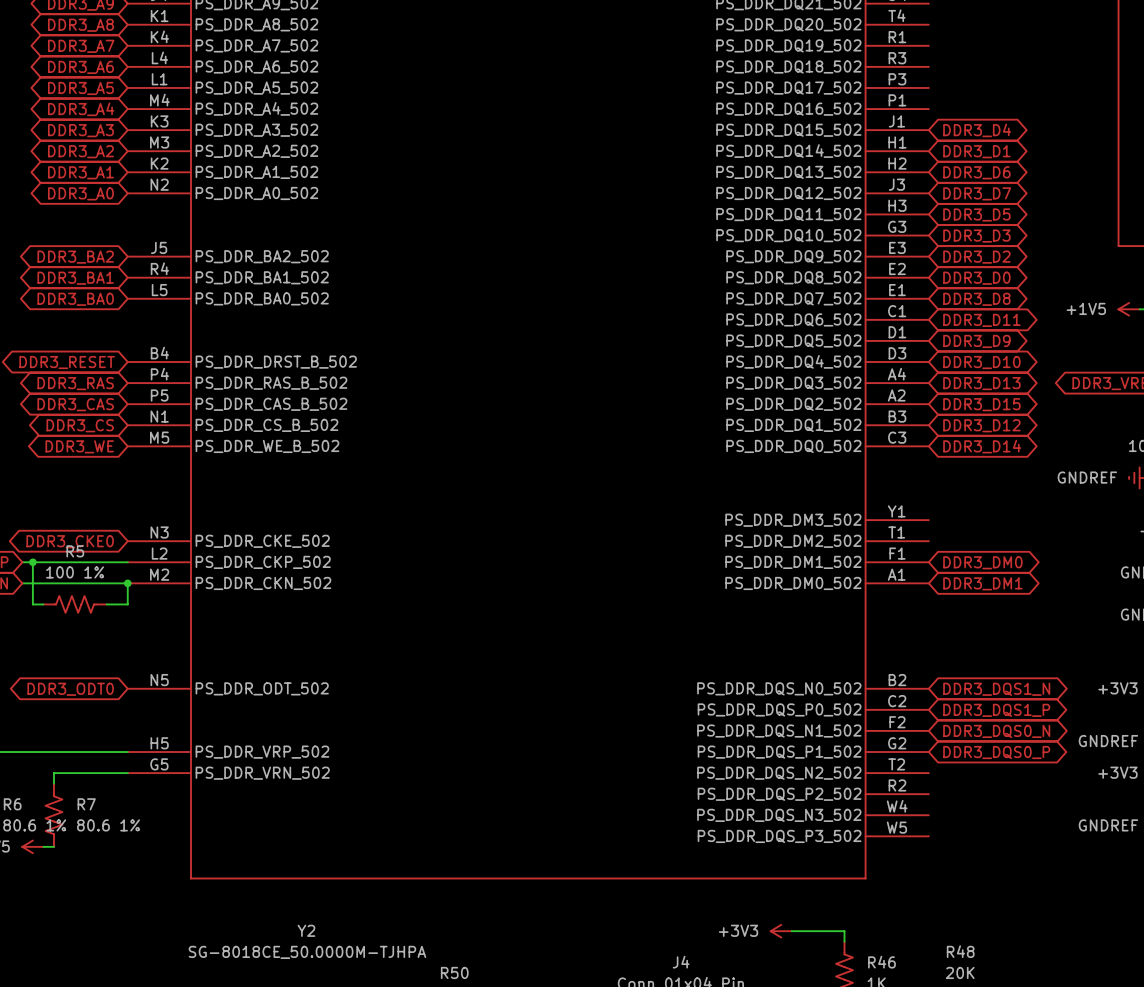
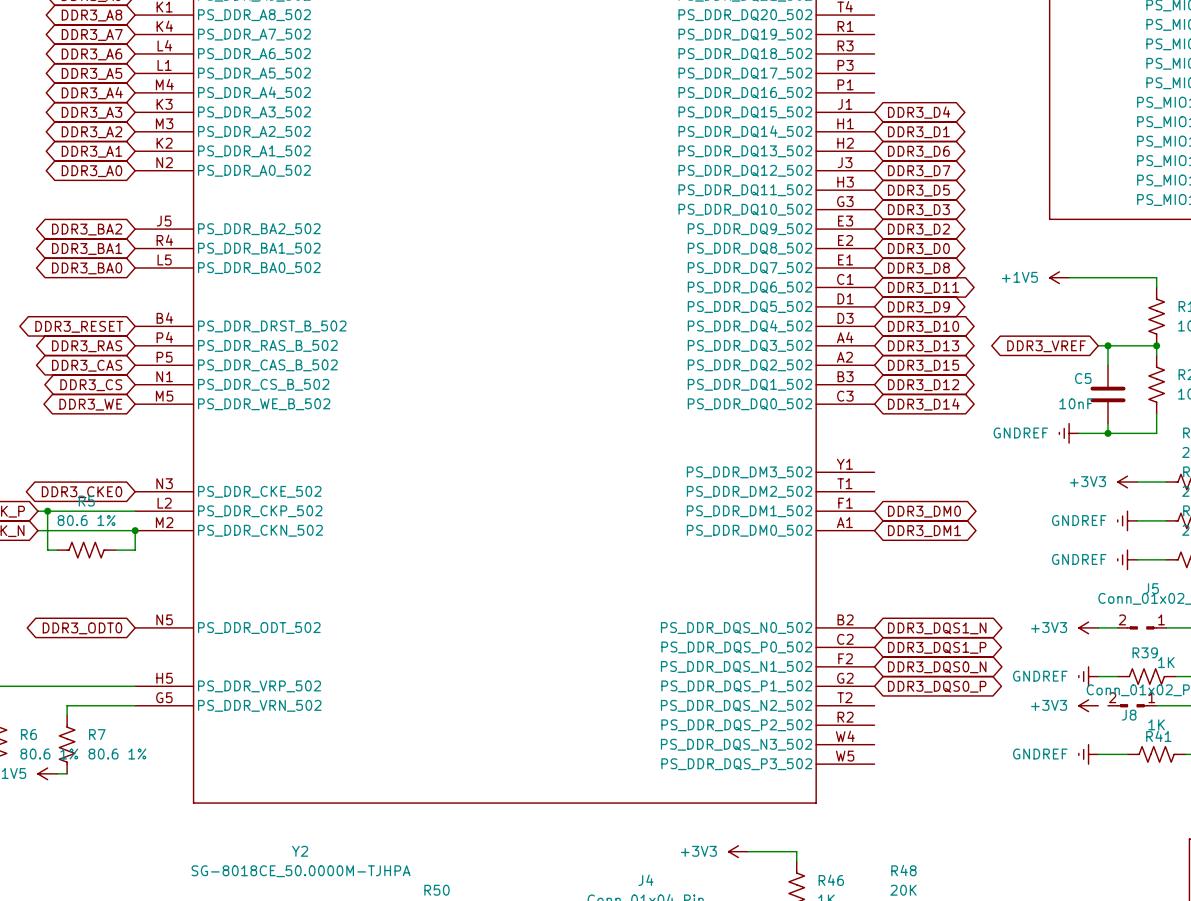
R5 value: 100 1% (75, 572) -> 80.6 1% (86, 520)

